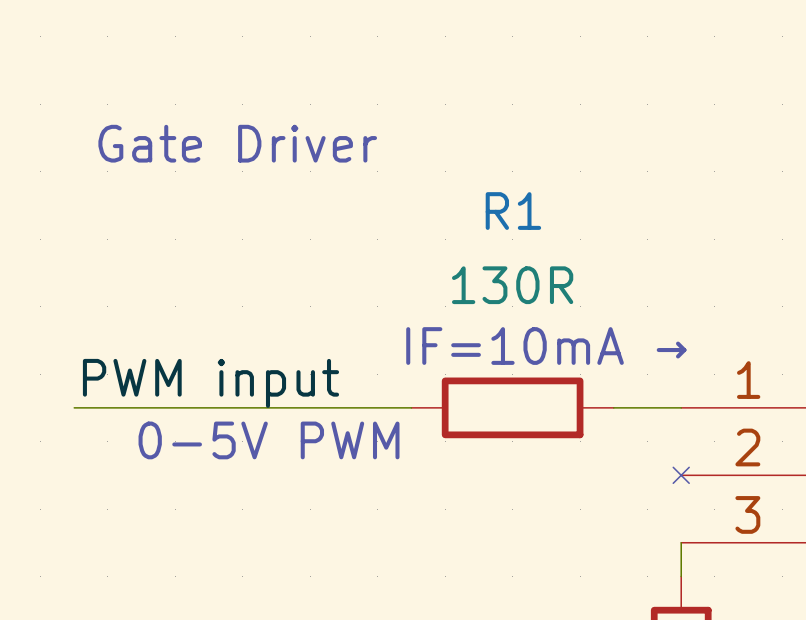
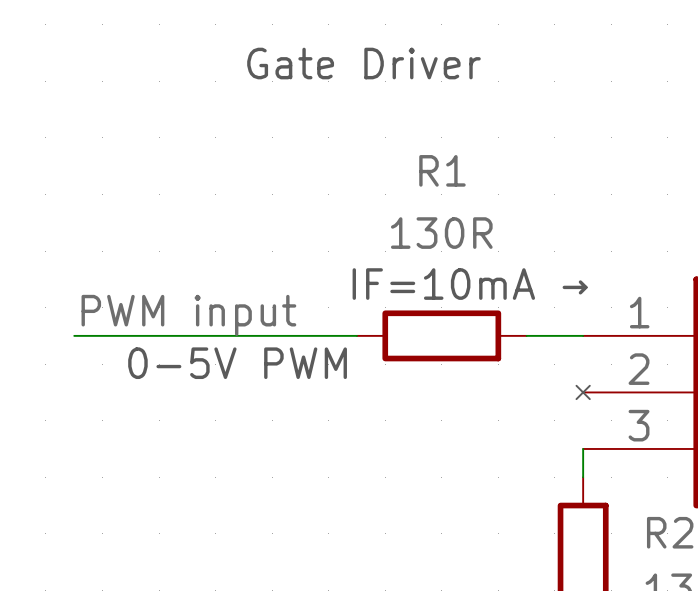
text position: Gate Driver (237, 143) -> Gate Driver (363, 63)

